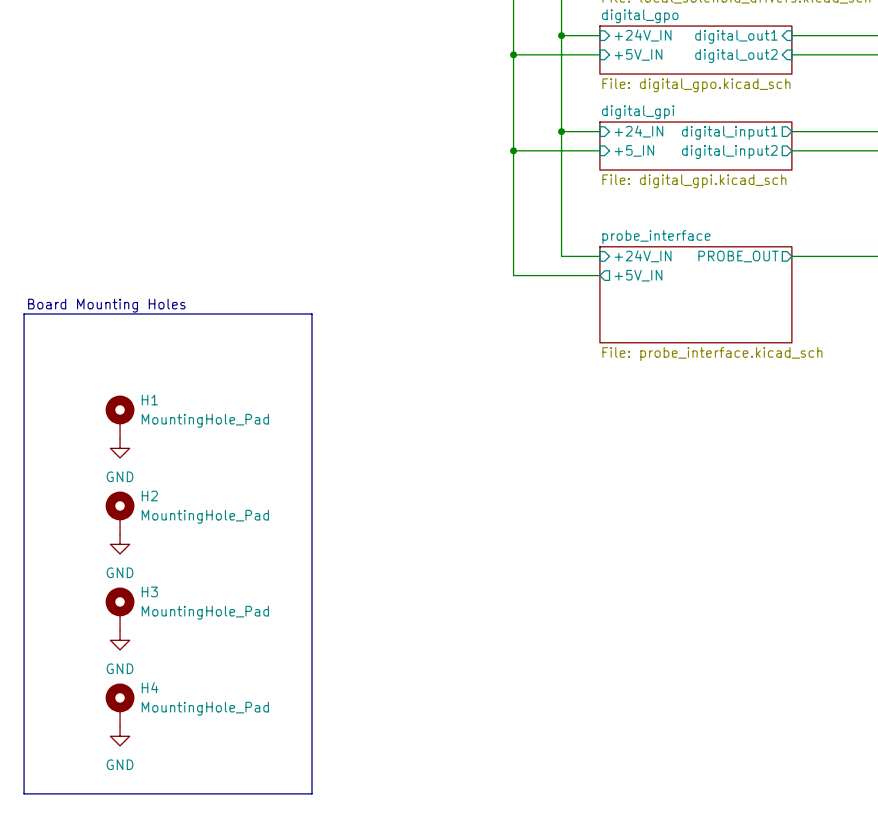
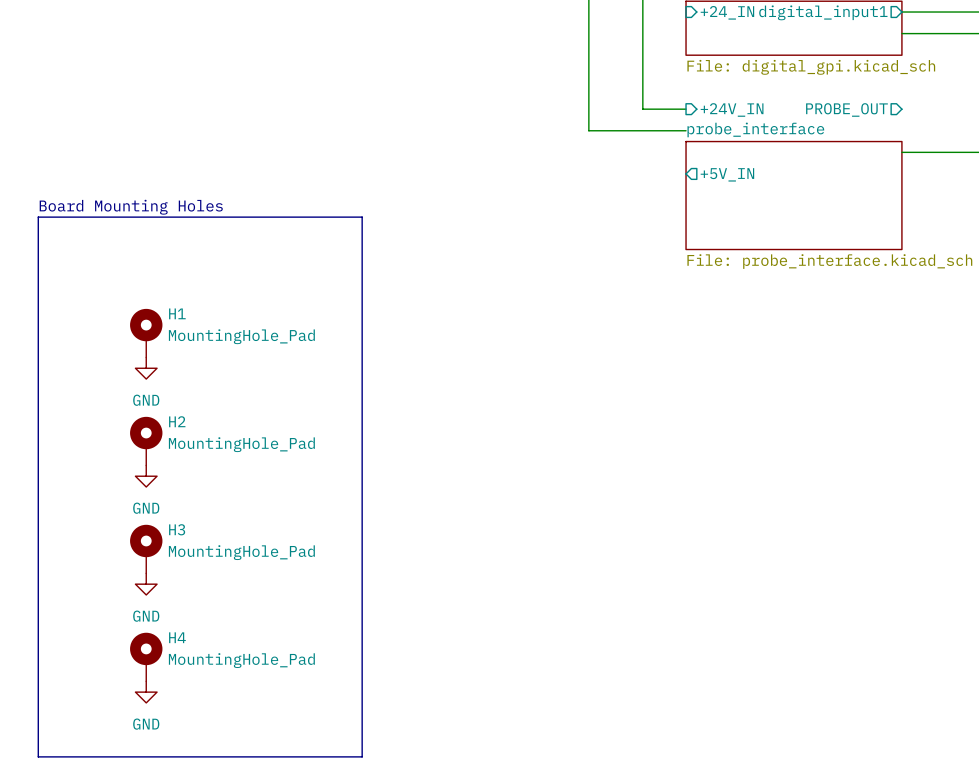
wire: (561, 131) (599, 131) -> none
junction: (561, 131) -> none
wire: (513, 150) (599, 150) -> none
junction: (513, 150) -> none
sheet pin: +5_IN (634, 150) -> none
sheet pin: digital_input2 (729, 152) -> none
wire: (561, 218) (561, 256) (599, 256) -> (642, 109) (686, 109)
wire: (513, 237) (513, 275) (599, 275) -> (588, 130) (686, 130)
sheet pin position: +24V_IN (643, 256) -> +24V_IN (732, 109)
sheet pin position: PROBE_OUT (738, 256) -> PROBE_OUT (846, 109)

